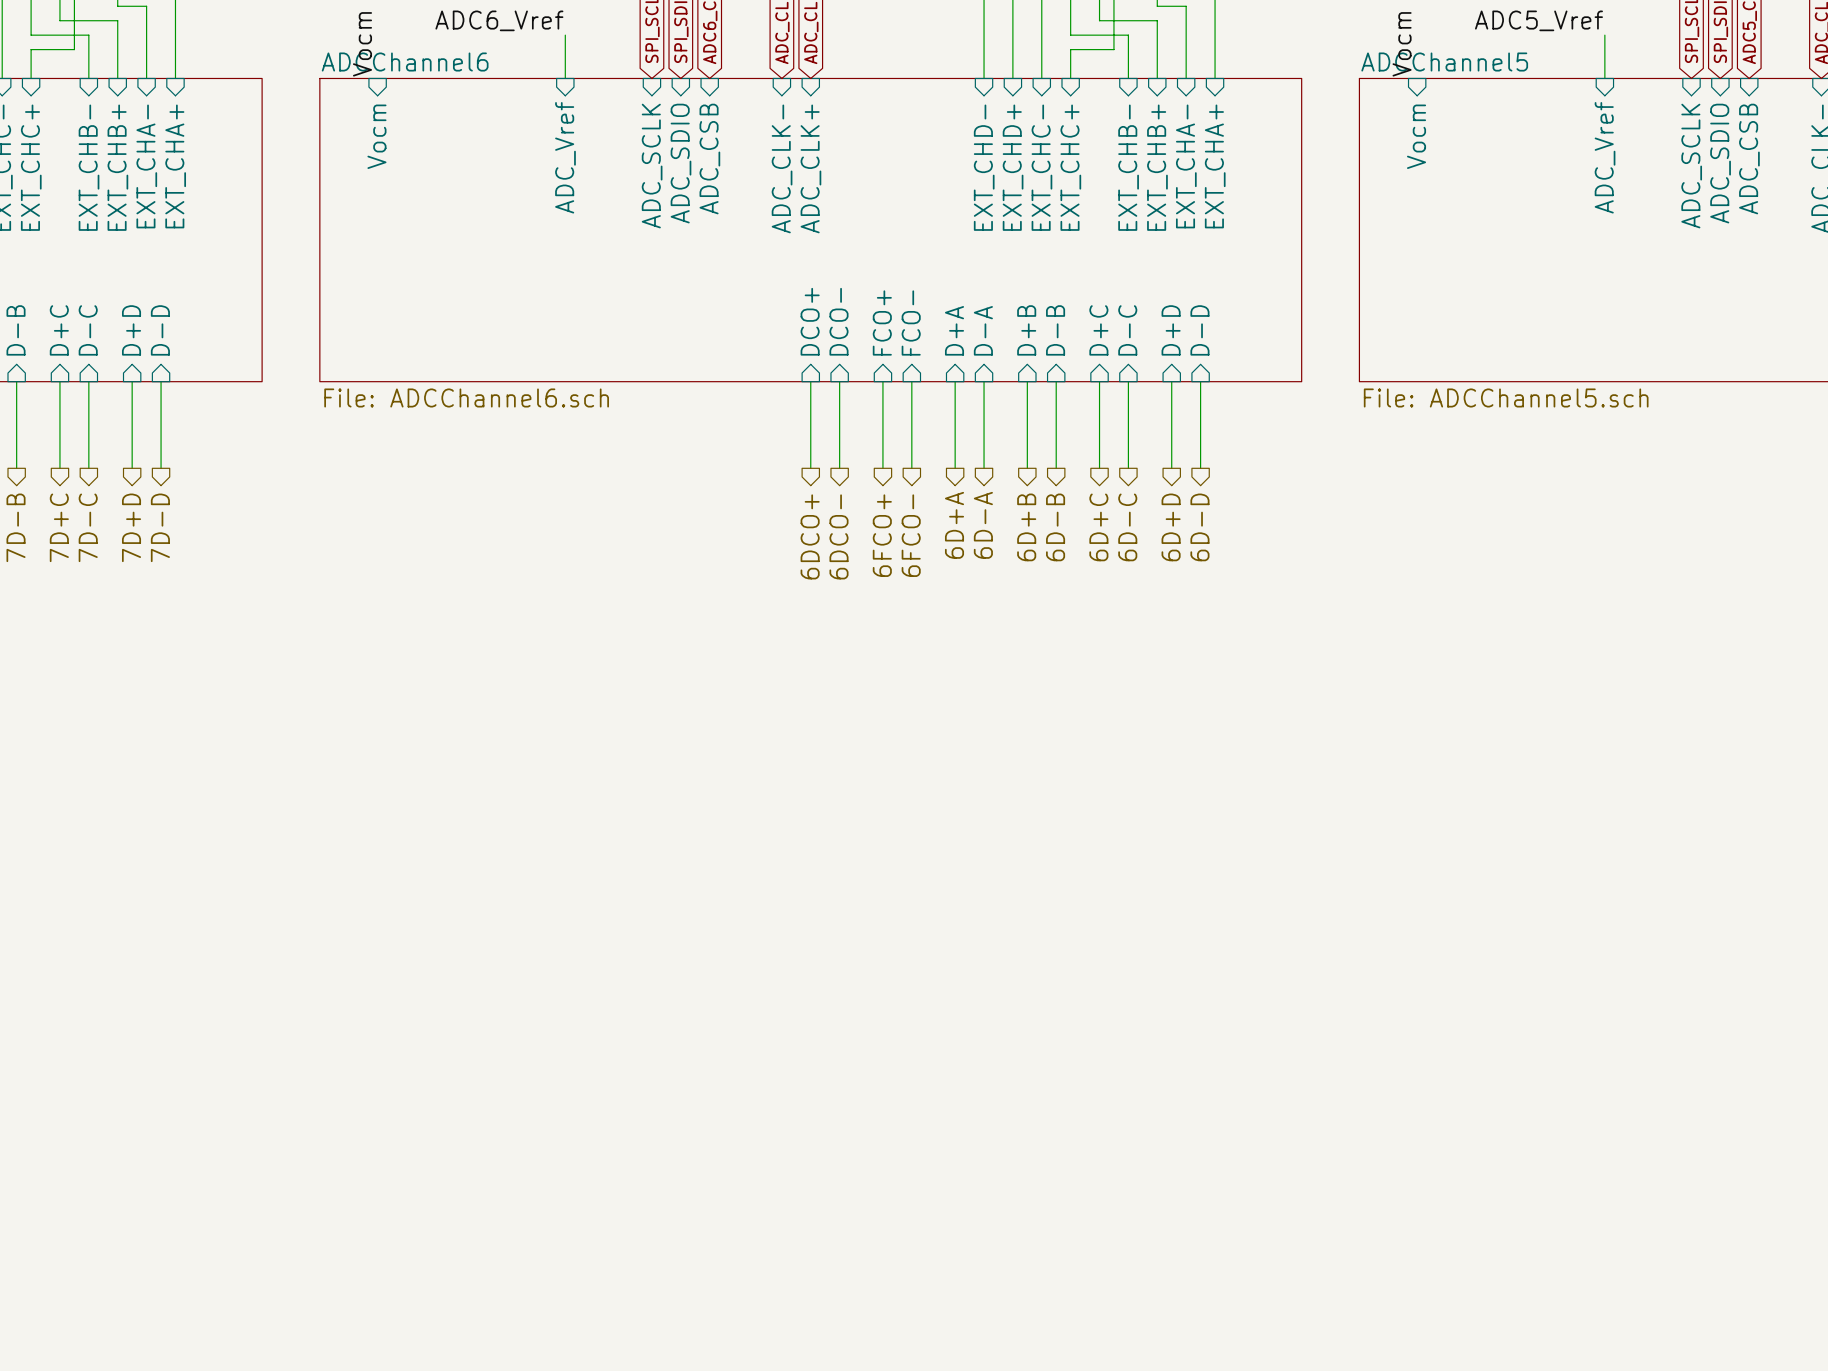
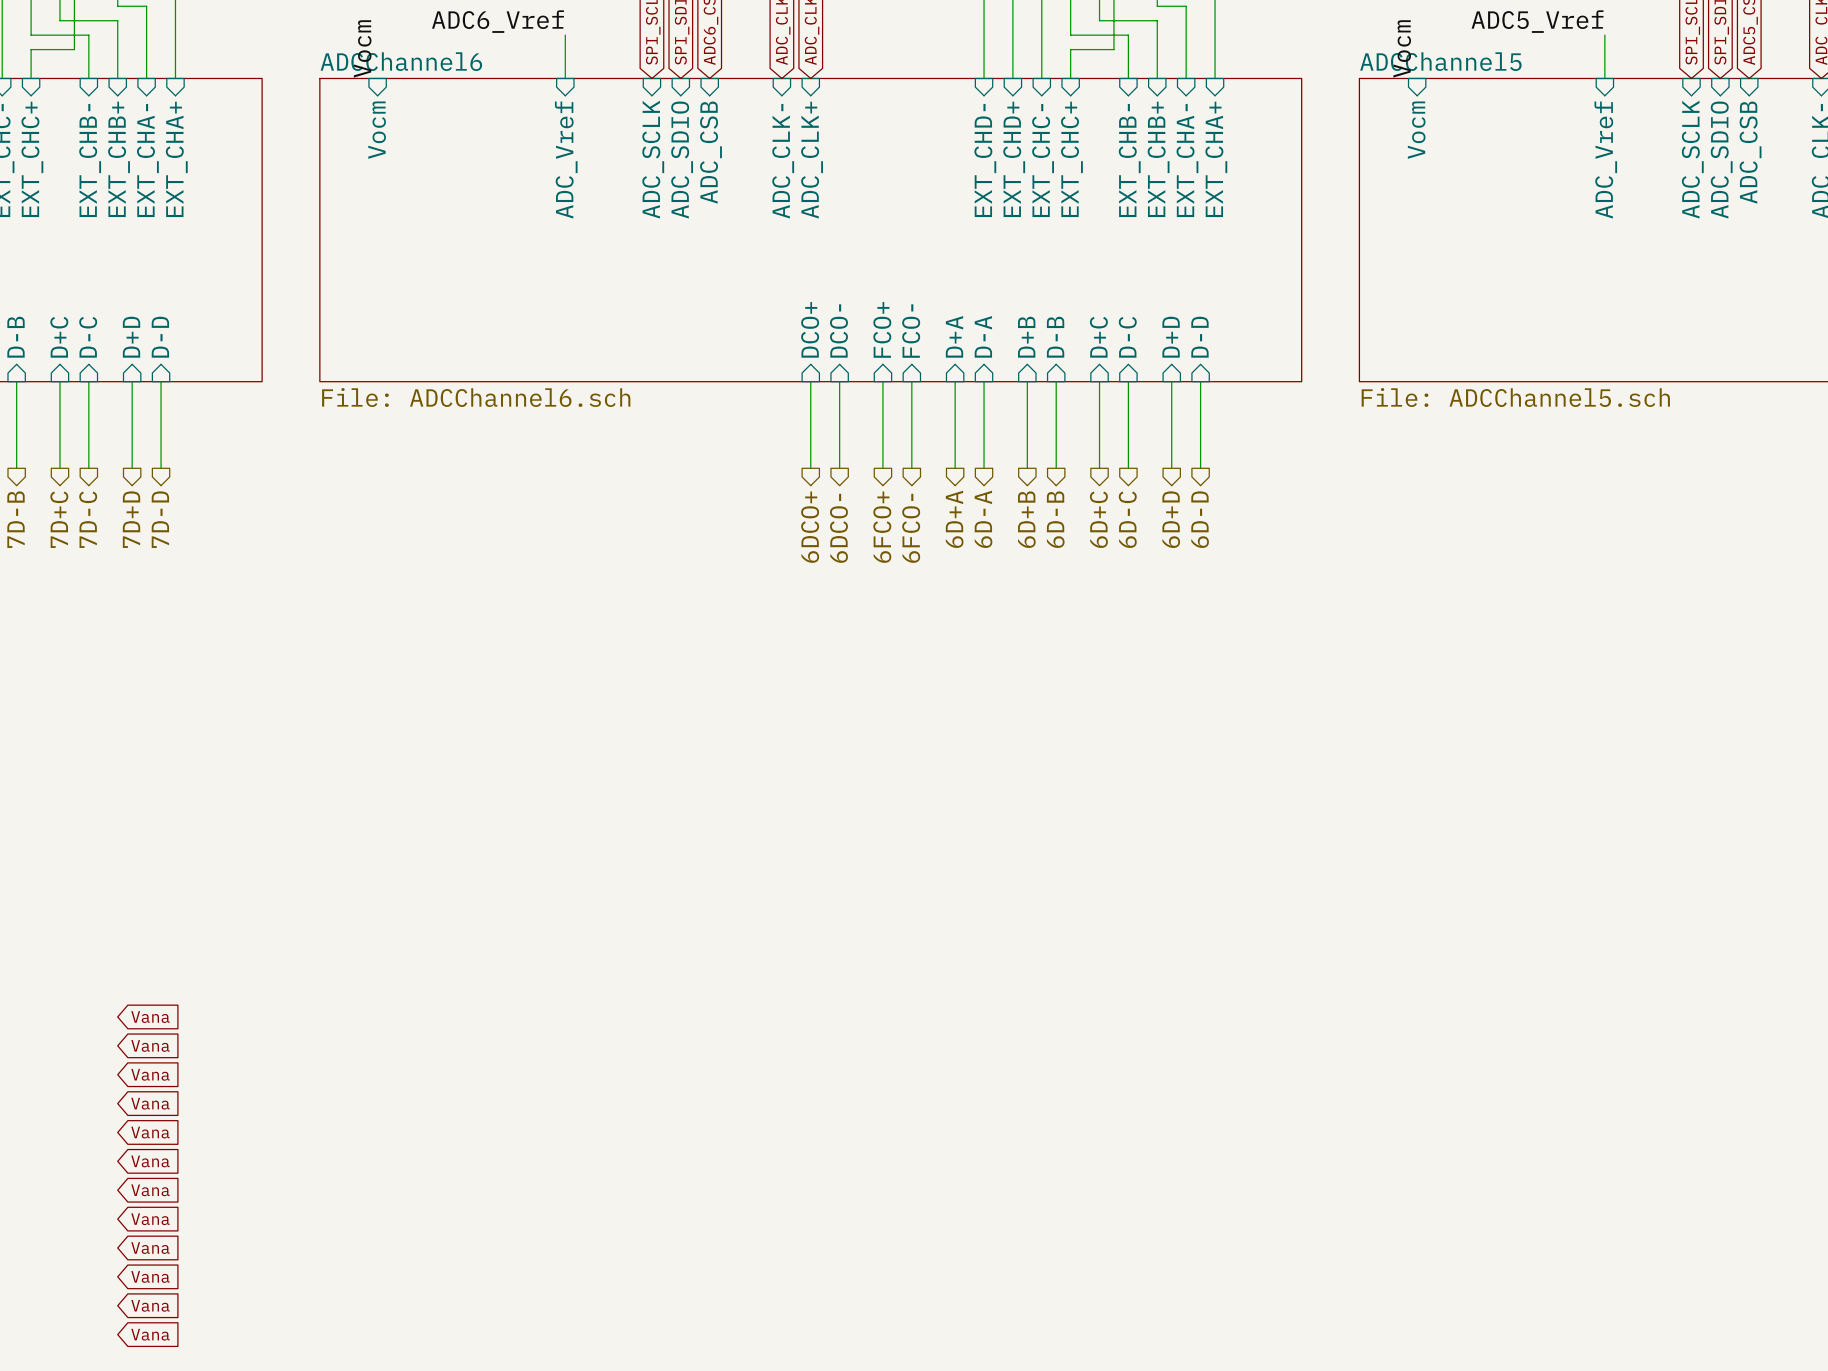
global label: none -> Vana (150, 1017)
global label: none -> Vana (150, 1045)
global label: none -> Vana (150, 1074)
global label: none -> Vana (150, 1103)
global label: none -> Vana (150, 1132)
global label: none -> Vana (150, 1161)
global label: none -> Vana (150, 1190)
global label: none -> Vana (150, 1219)
global label: none -> Vana (150, 1248)
global label: none -> Vana (150, 1276)
global label: none -> Vana (150, 1305)
global label: none -> Vana (150, 1334)

